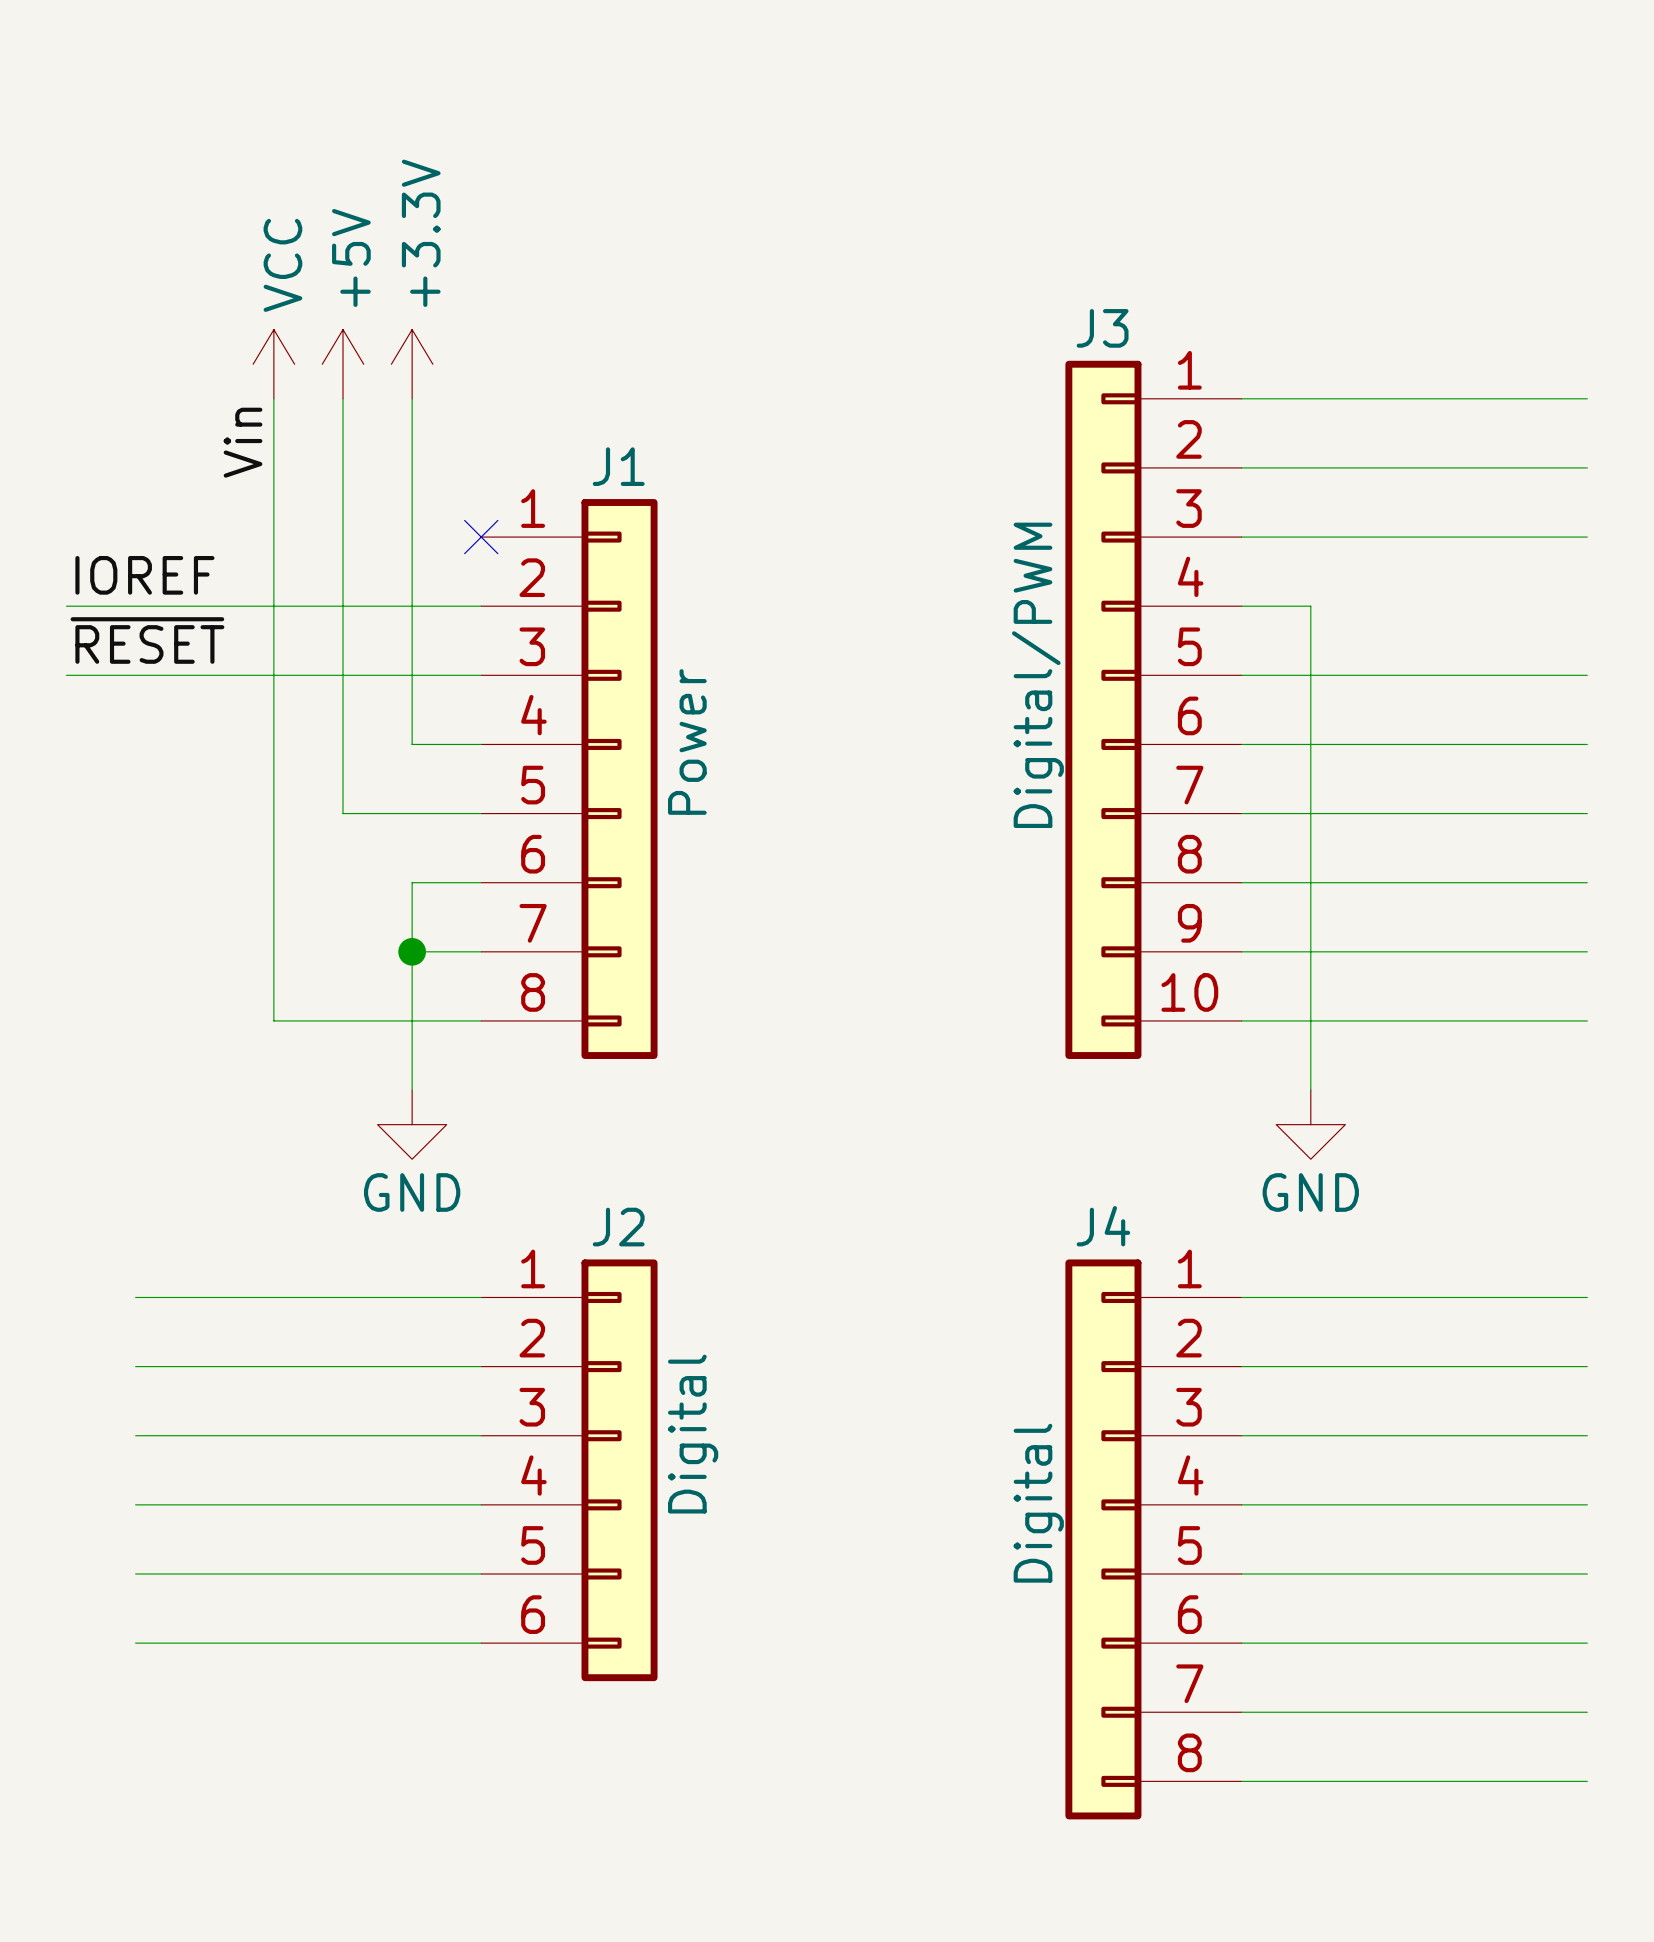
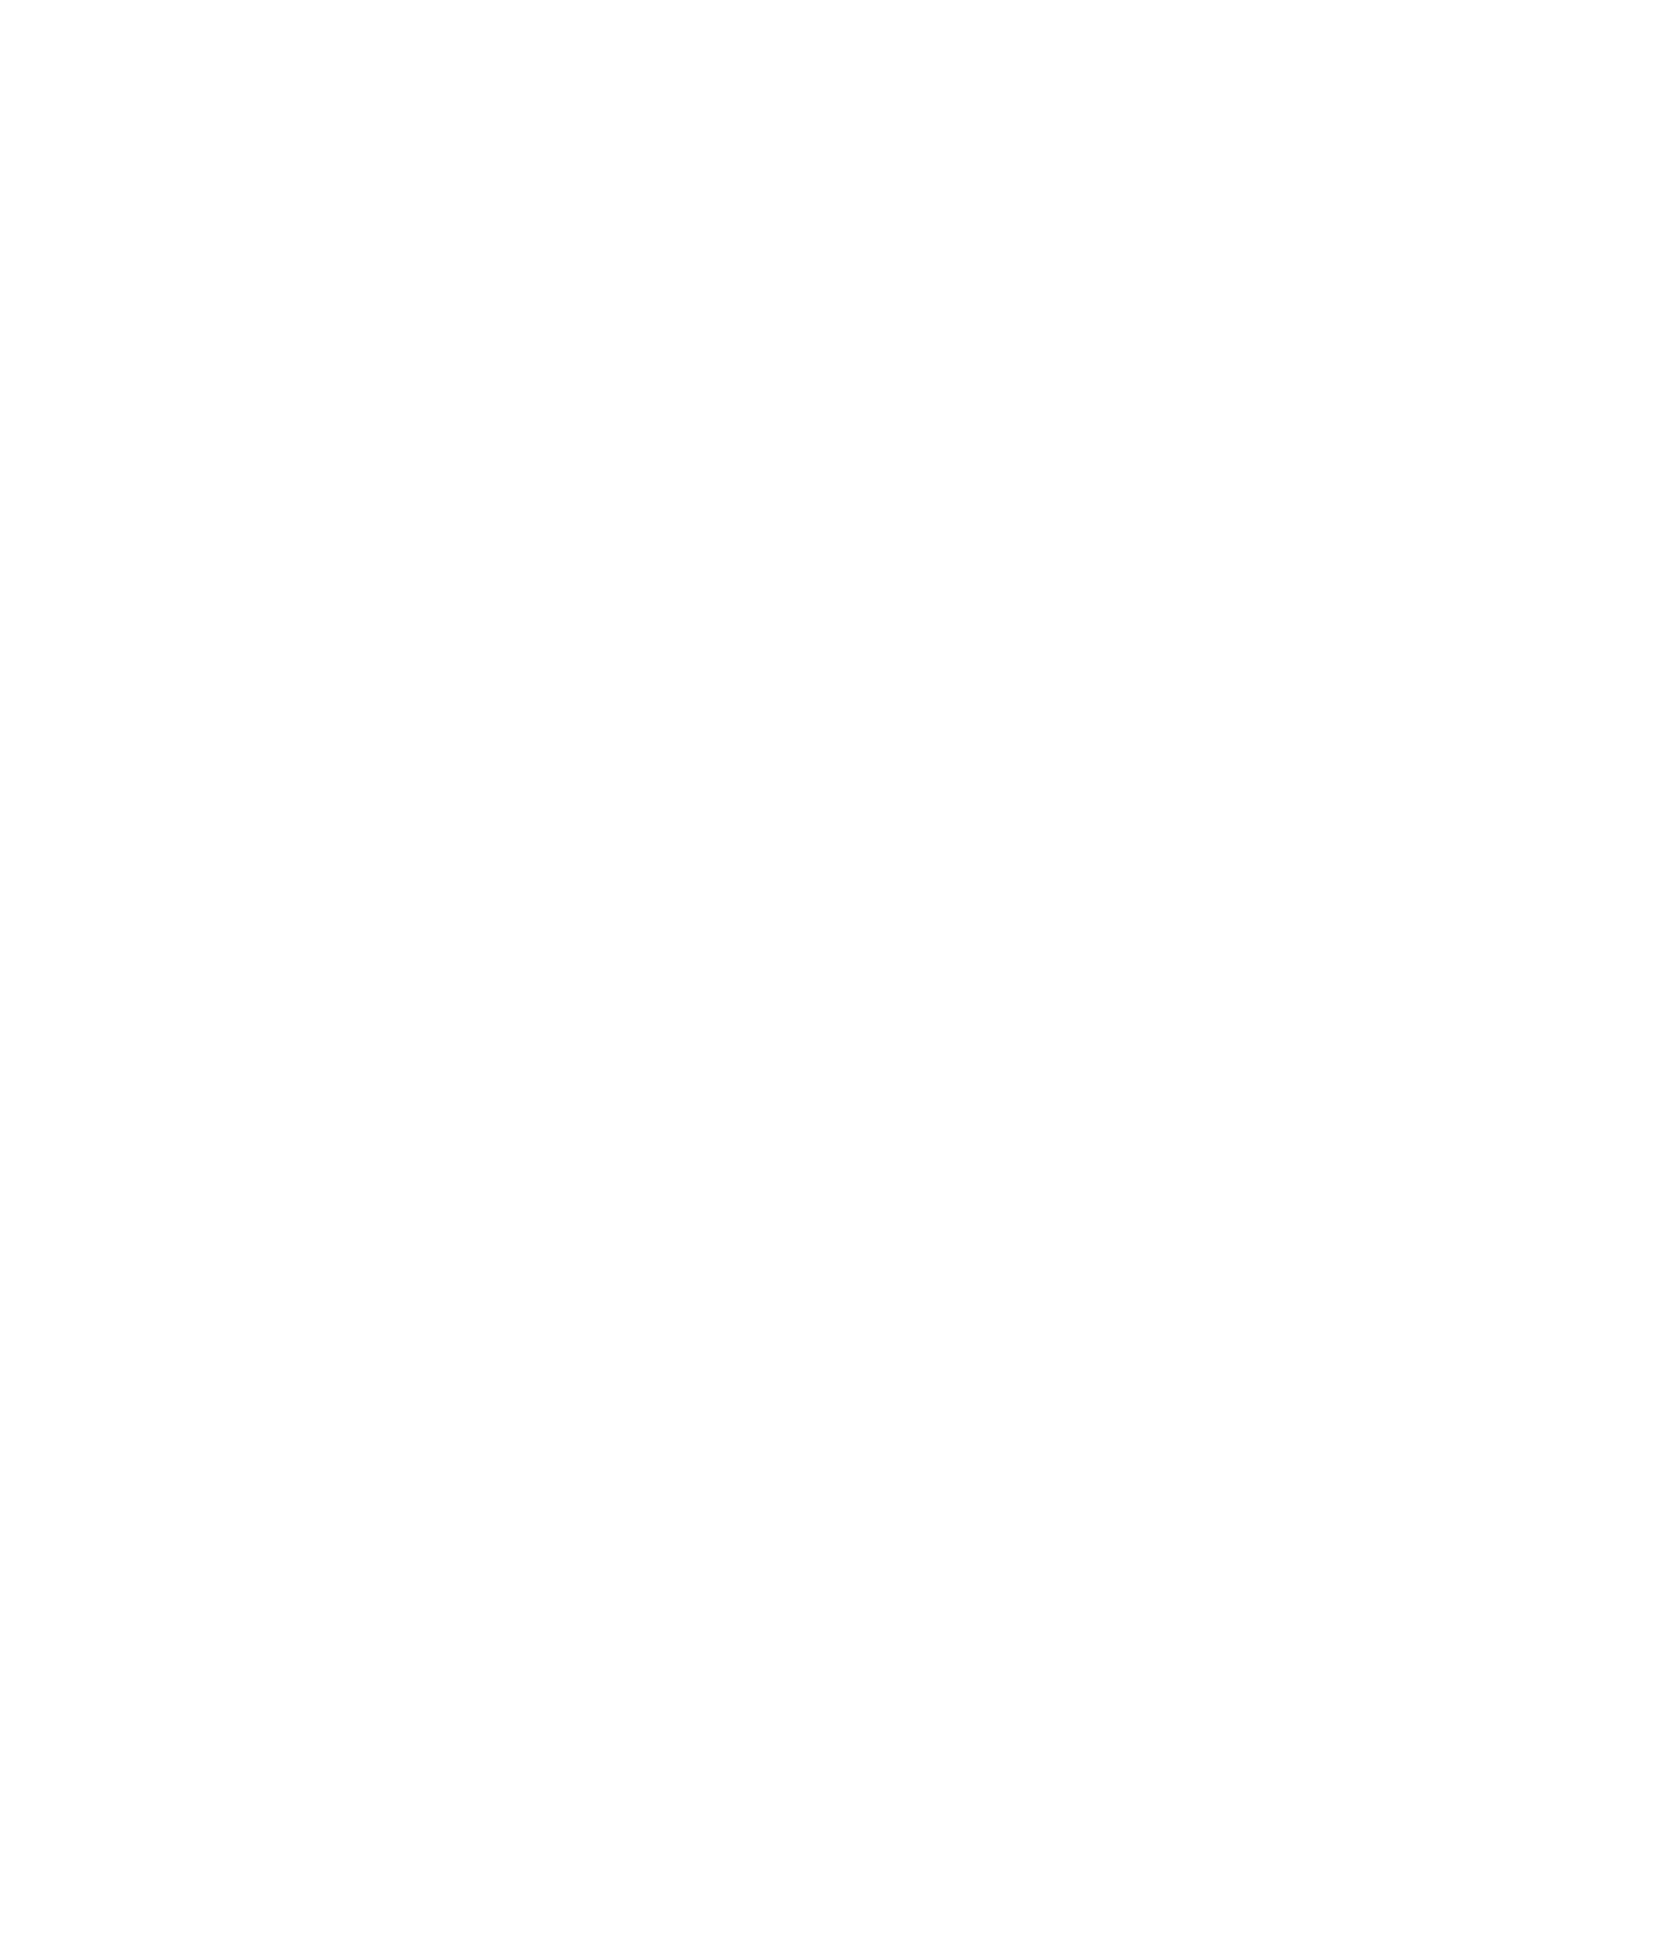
power symbol: VCC (273, 364) -> none
power symbol: +5V (343, 364) -> none
power symbol: +3.3V (412, 364) -> none
wire: (273, 398) (273, 1020) (481, 1020) -> none
wire: (343, 398) (343, 813) (481, 813) -> none
wire: (412, 398) (412, 744) (481, 744) -> none
wire: (1241, 398) (1587, 398) -> none
label: Vin (243, 442) -> none
wire: (1241, 467) (1587, 467) -> none
no-connect mark: (481, 537) -> none
wire: (1241, 537) (1587, 537) -> none
label: IOREF (144, 575) -> none
wire: (66, 606) (481, 606) -> none
wire: (1241, 606) (1310, 606) (1310, 1090) -> none
label: ~{RESET} (147, 640) -> none
wire: (66, 675) (481, 675) -> none
wire: (1241, 675) (1587, 675) -> none
J3: Digital/PWM (1153, 709) -> none
wire: (1241, 744) (1587, 744) -> none
J1: Power (569, 779) -> none
wire: (1241, 813) (1587, 813) -> none
wire: (481, 882) (412, 882) (412, 1090) -> none
wire: (1241, 882) (1587, 882) -> none
wire: (412, 951) (481, 951) -> none
junction: (412, 951) -> none
wire: (1241, 951) (1587, 951) -> none
wire: (1241, 1020) (1587, 1020) -> none
power symbol: GND (412, 1124) -> none
power symbol: GND (1310, 1124) -> none
wire: (135, 1297) (481, 1297) -> none
wire: (1241, 1297) (1587, 1297) -> none
wire: (135, 1366) (481, 1366) -> none
wire: (1241, 1366) (1587, 1366) -> none
wire: (135, 1435) (481, 1435) -> none
wire: (1241, 1435) (1587, 1435) -> none
J2: Digital (569, 1470) -> none
wire: (135, 1504) (481, 1504) -> none
wire: (1241, 1504) (1587, 1504) -> none
J4: Digital (1153, 1539) -> none
wire: (135, 1573) (481, 1573) -> none
wire: (1241, 1573) (1587, 1573) -> none
wire: (135, 1643) (481, 1643) -> none
wire: (1241, 1643) (1587, 1643) -> none
wire: (1241, 1712) (1587, 1712) -> none
wire: (1241, 1781) (1587, 1781) -> none

